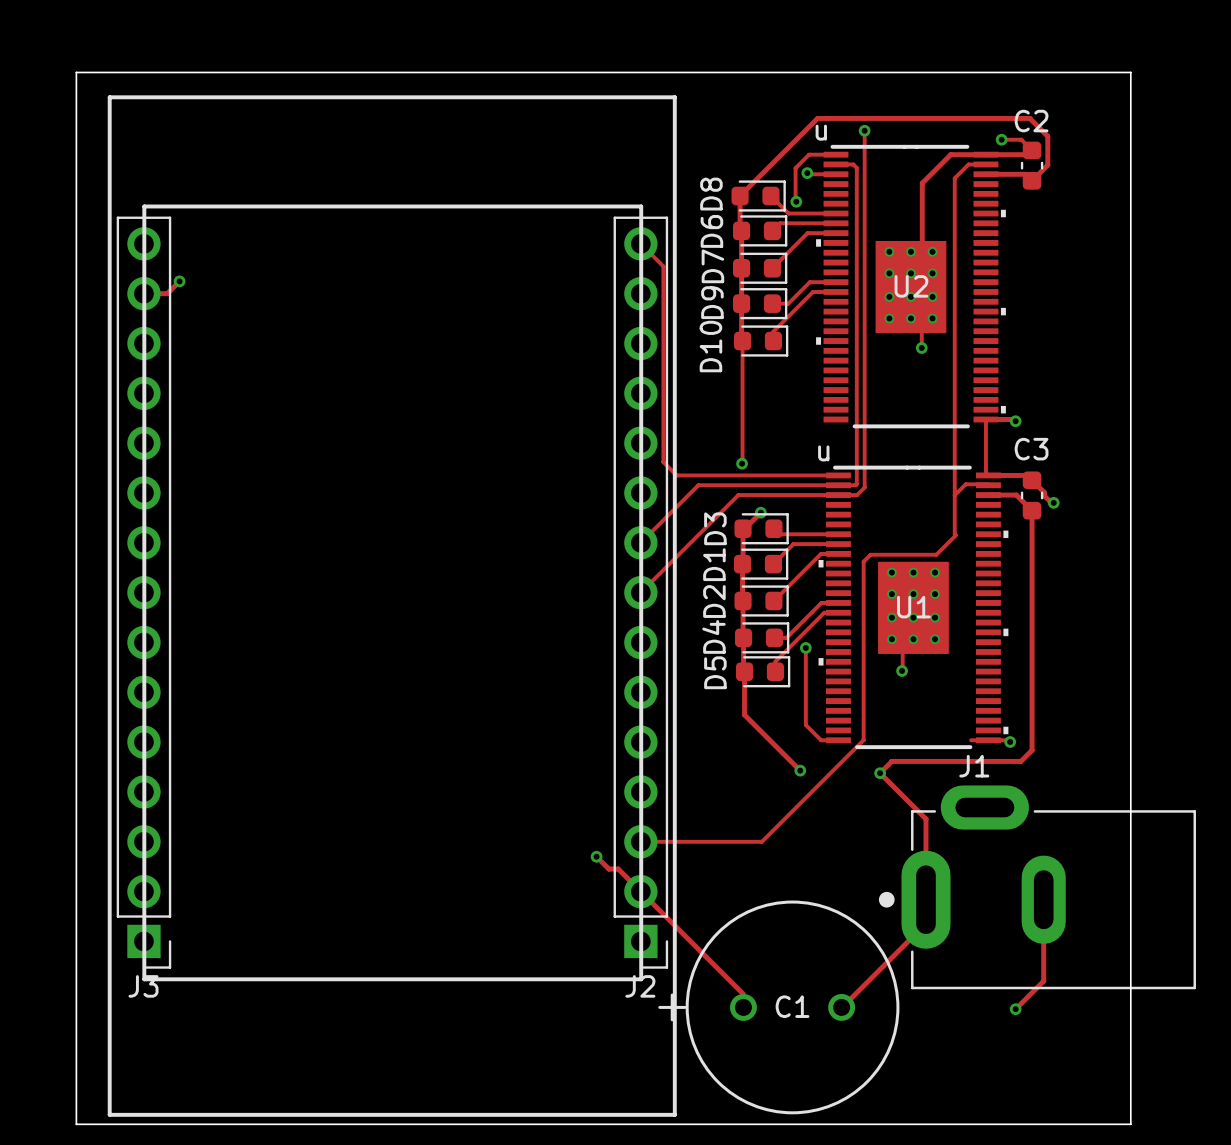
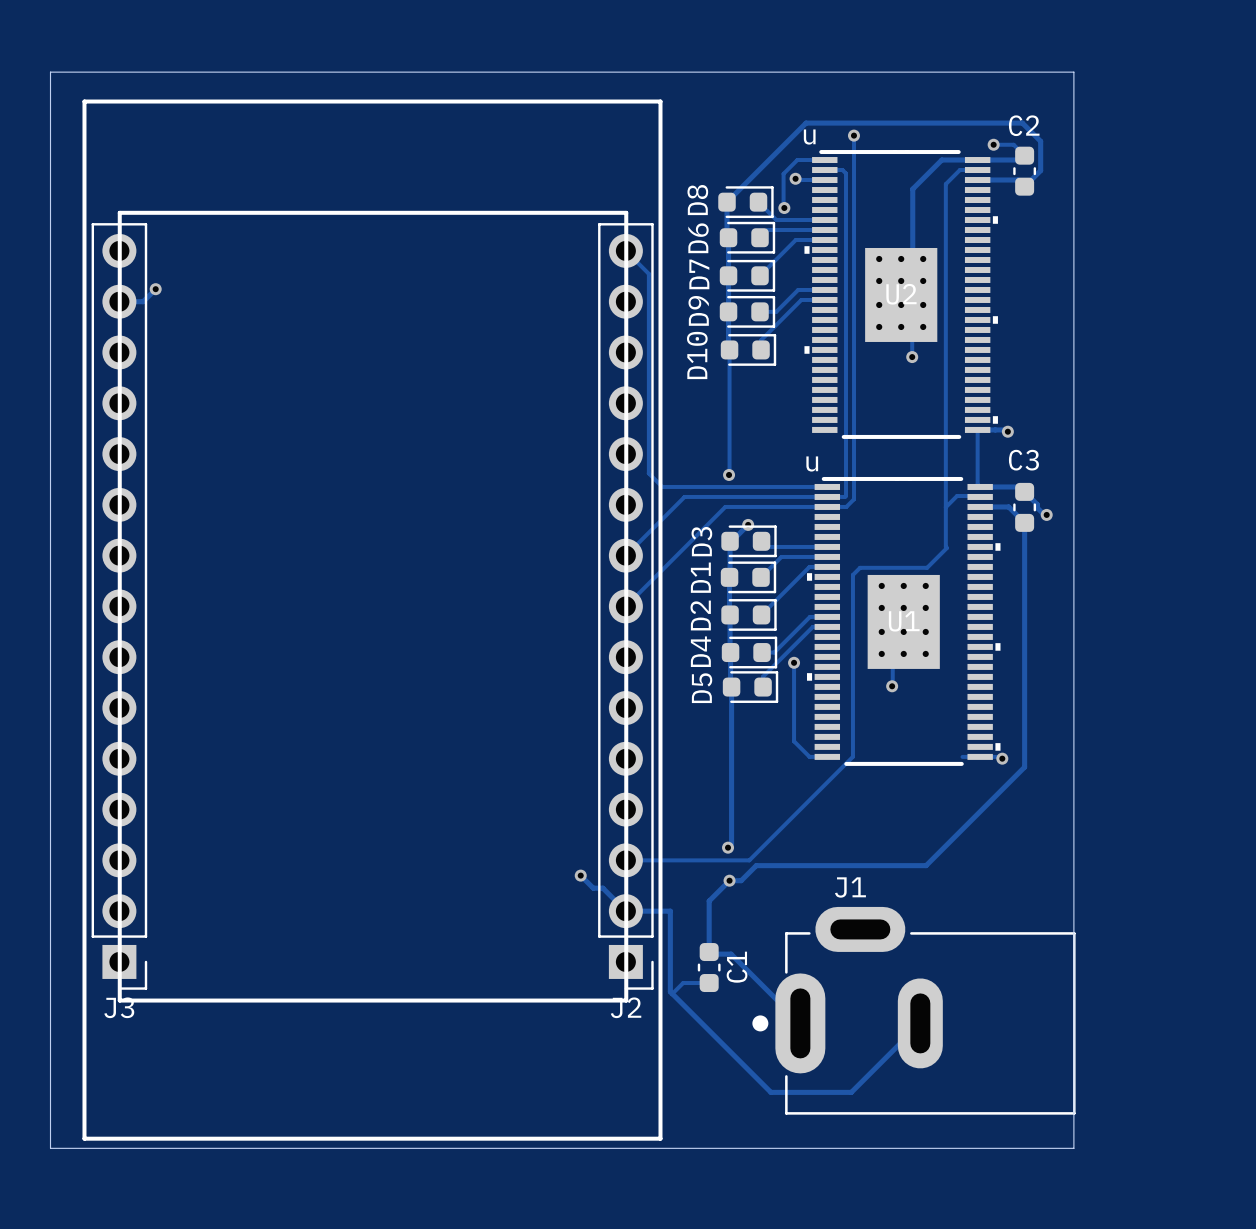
board edge: (76, 72) (1130, 72) (1130, 1124) (1080, 1124) -> (50, 76) (50, 72) (1073, 72) (1073, 1148)
track: (744, 714) (800, 770) -> (731, 731) (731, 844) (728, 847)
track: (1020, 761) (891, 761) (880, 773) (926, 819) (926, 923) (841, 1008) -> (1013, 778) (926, 865) (756, 865) (741, 880) (729, 880) (709, 901) (709, 954) (731, 954) (800, 1023)
via: (800, 770) -> none
via: (880, 773) -> none
via: none -> (728, 847)
via: none -> (729, 880)
J1 position: (1037, 887) -> (913, 1010)
track: (640, 891) (743, 994) (743, 1008) -> (625, 911) (670, 911) (670, 991) (770, 1092) (851, 1092) (920, 1023)
track: (1043, 899) (1043, 981) (1015, 1009) -> none
C1 footprint: [658, 900, 900, 1115] -> [697, 943, 721, 993]
track: none -> (709, 983) (683, 983) (672, 993)
via: (1015, 1009) -> none

